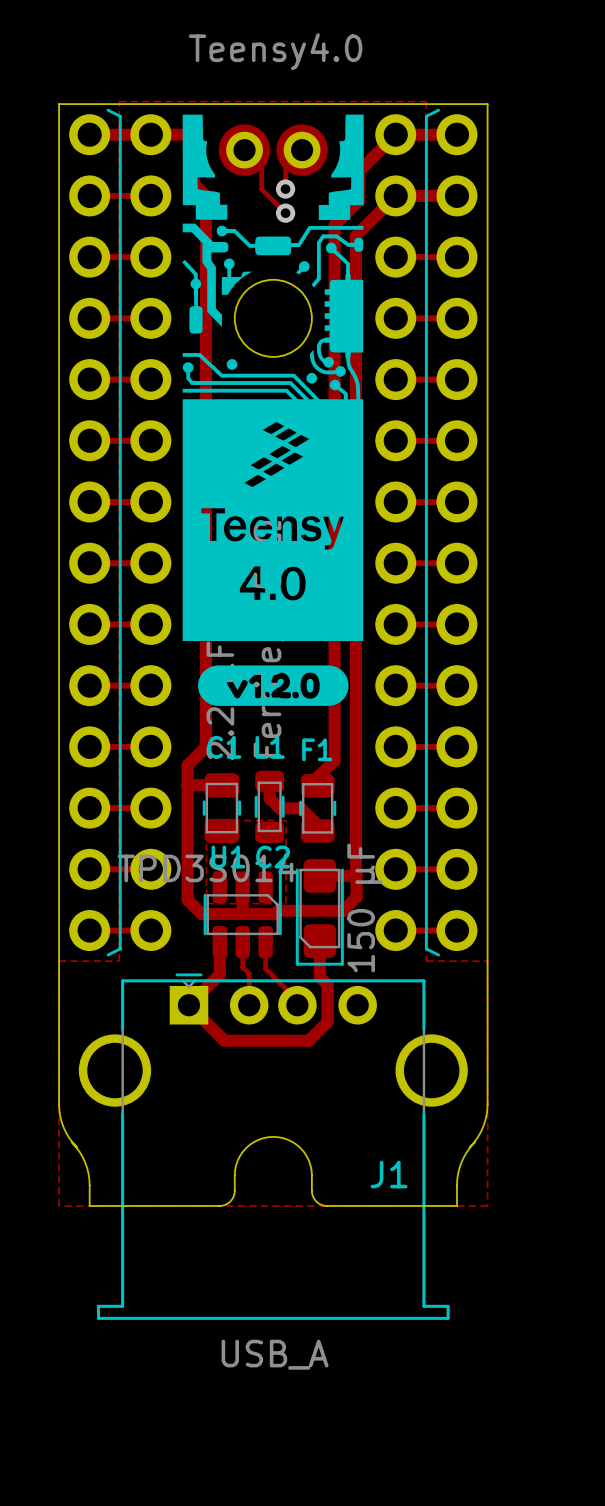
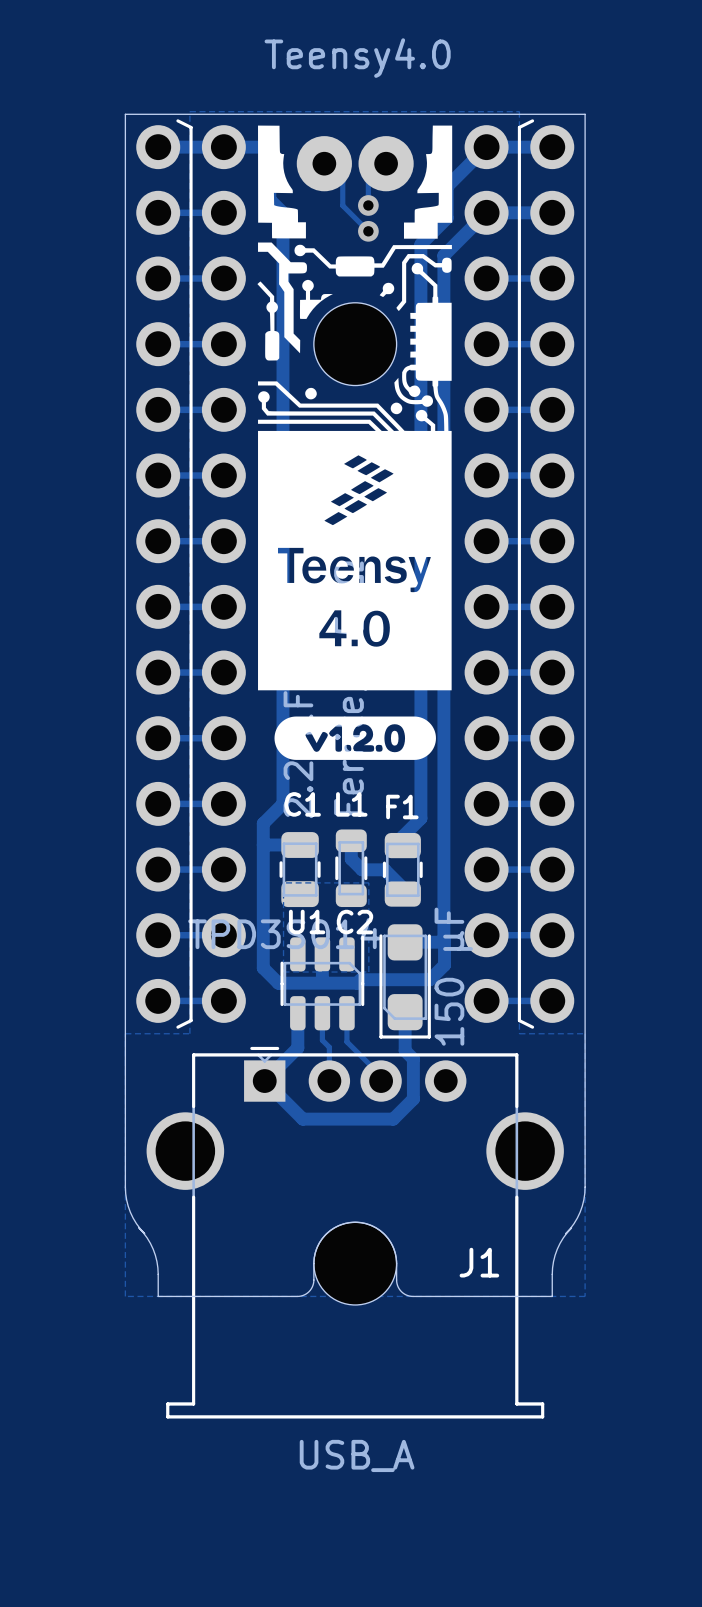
part: none -> (355, 1263)

